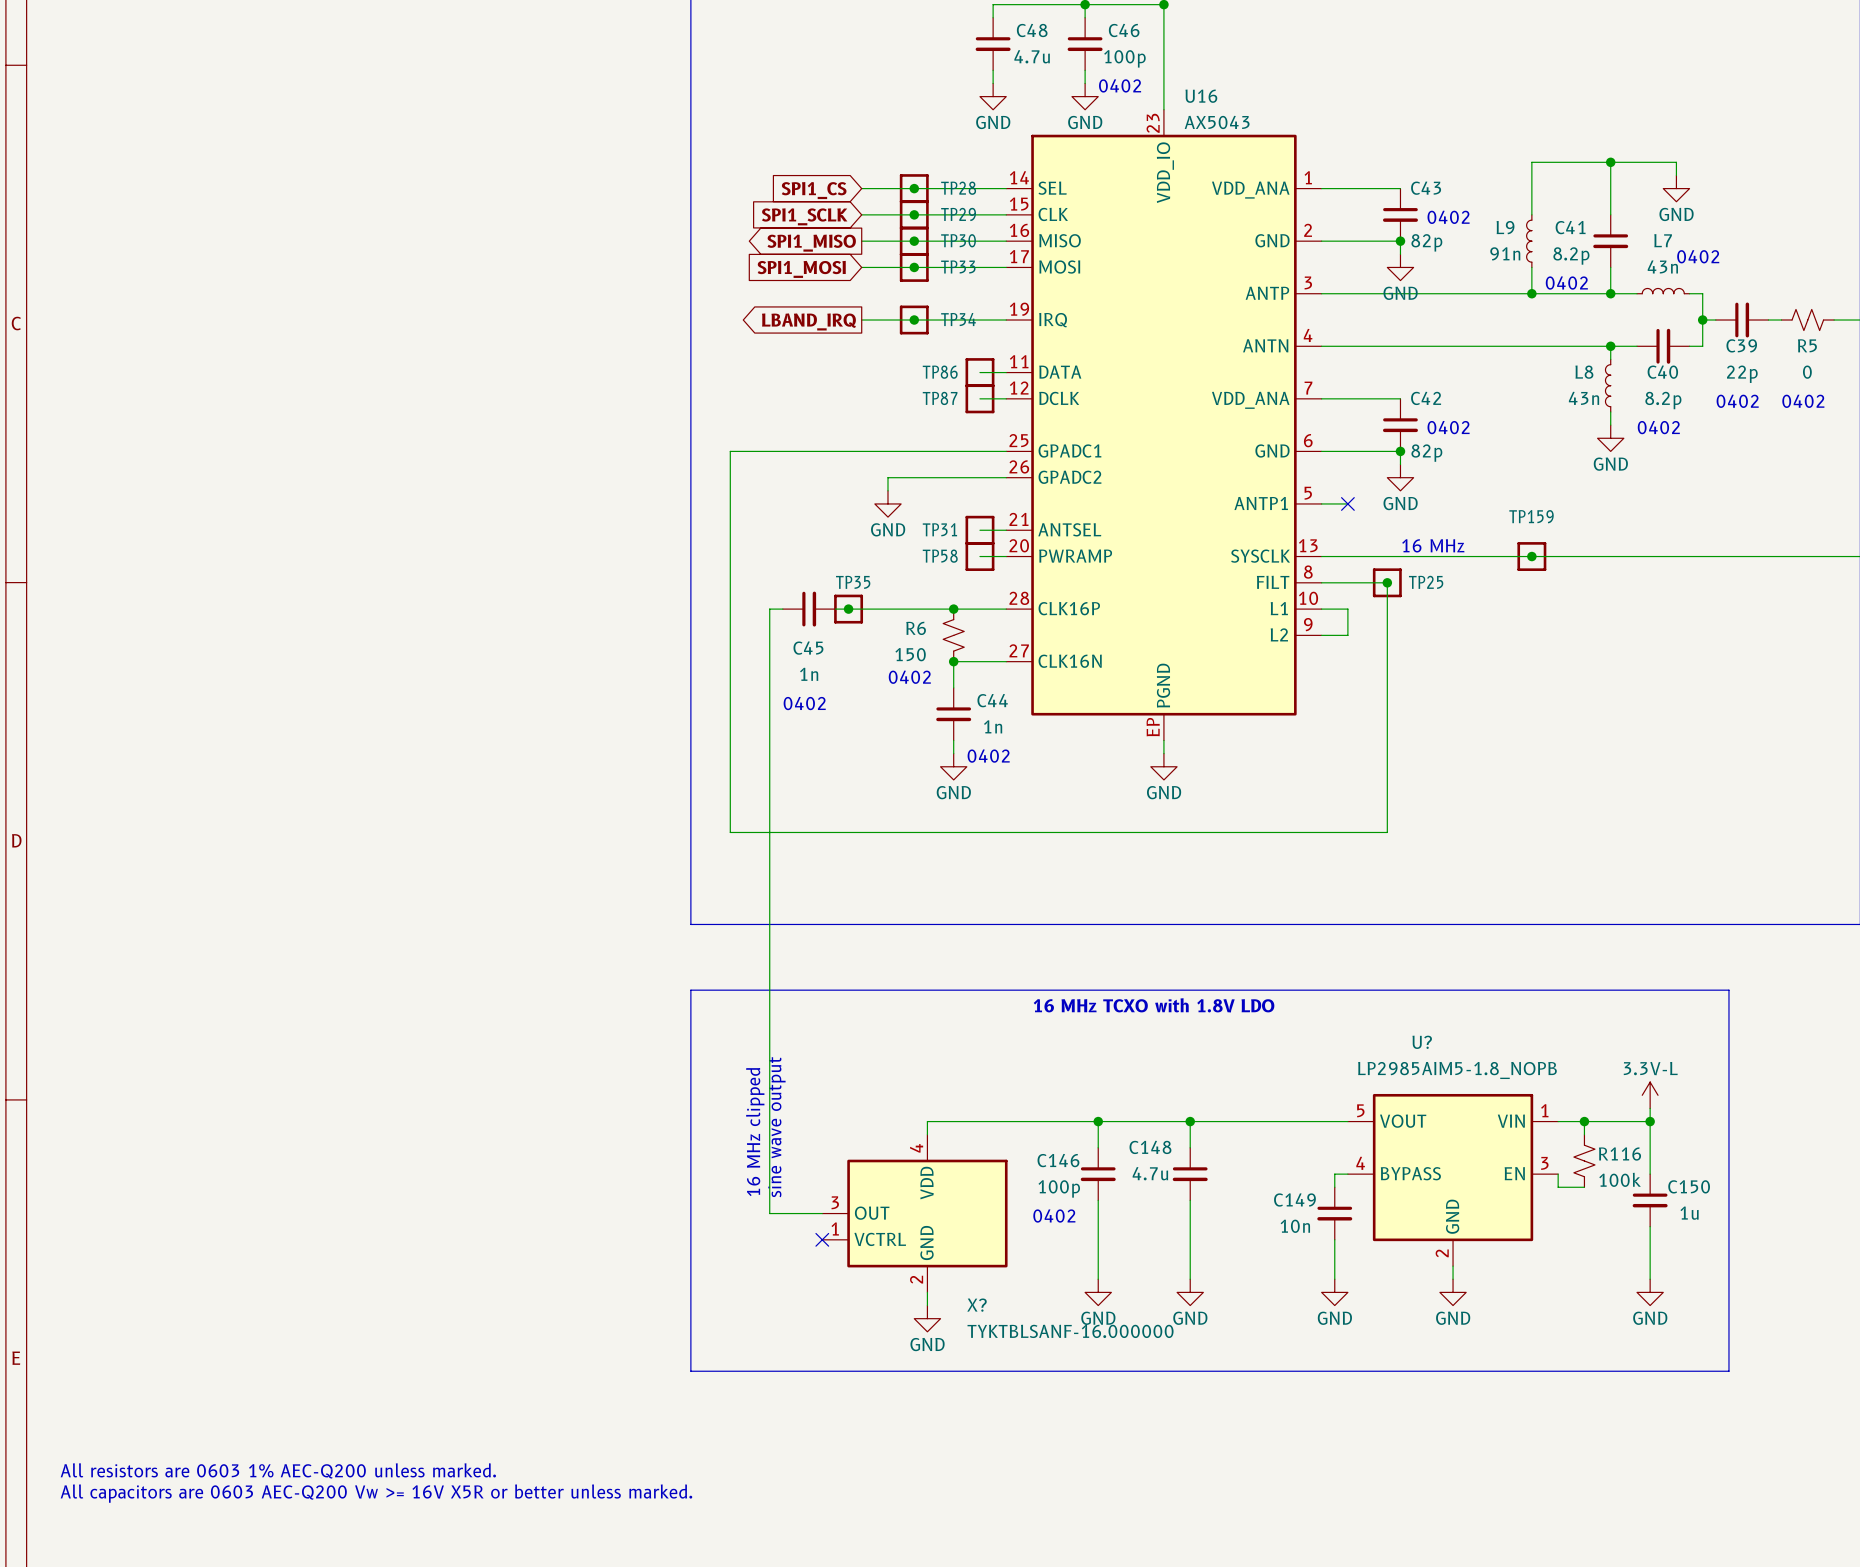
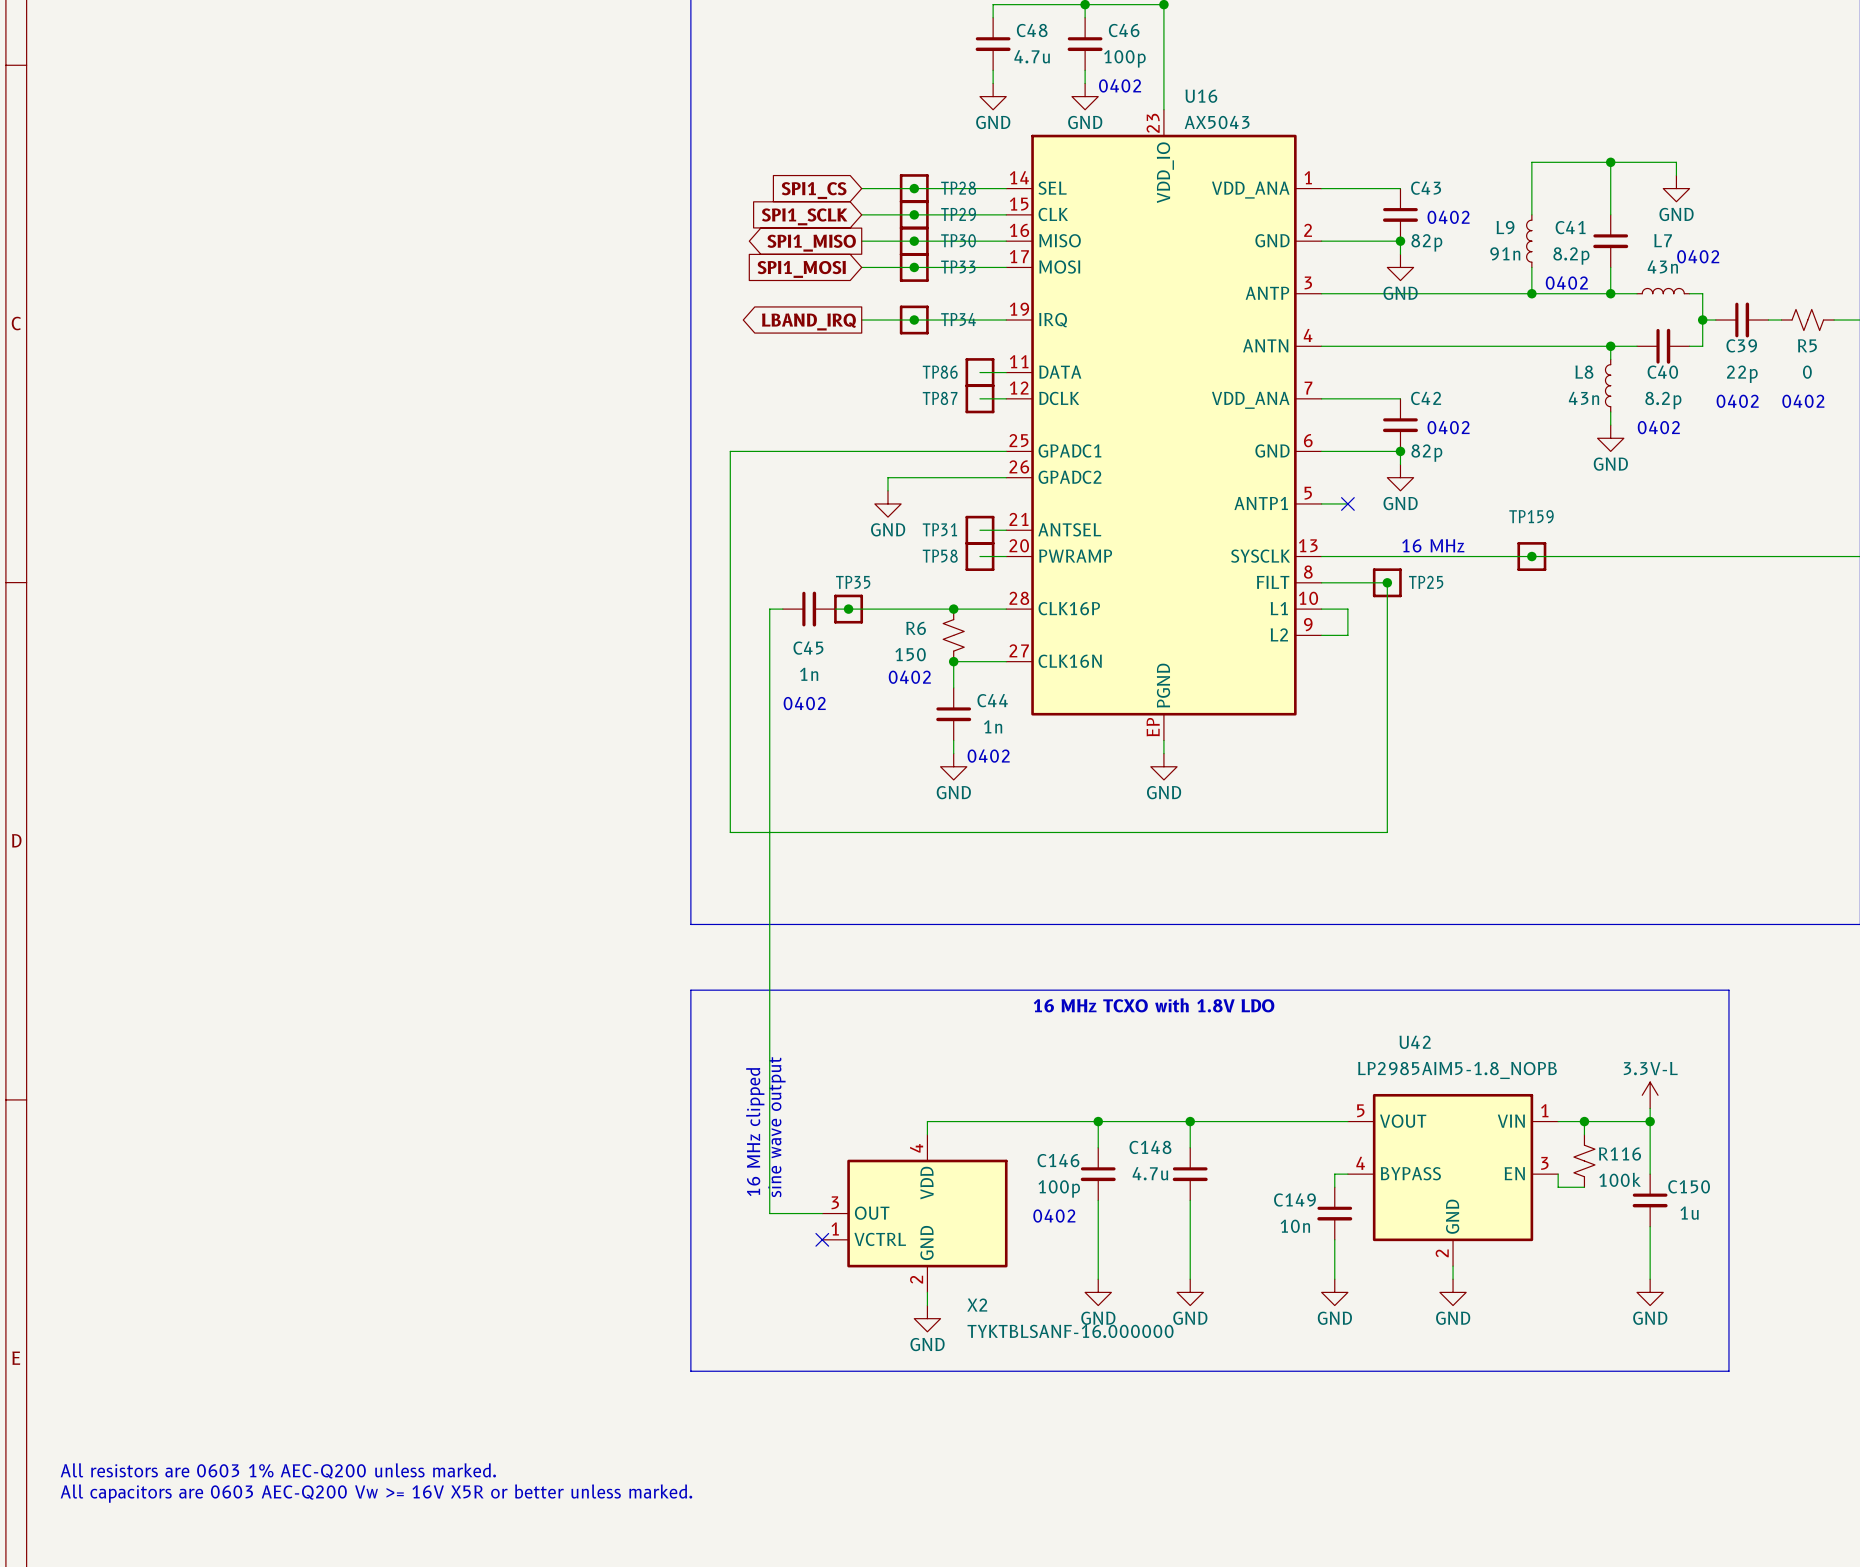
U? name: U? (1422, 1042) -> U42 (1415, 1042)
X? name: X? (977, 1305) -> X2 (977, 1305)

